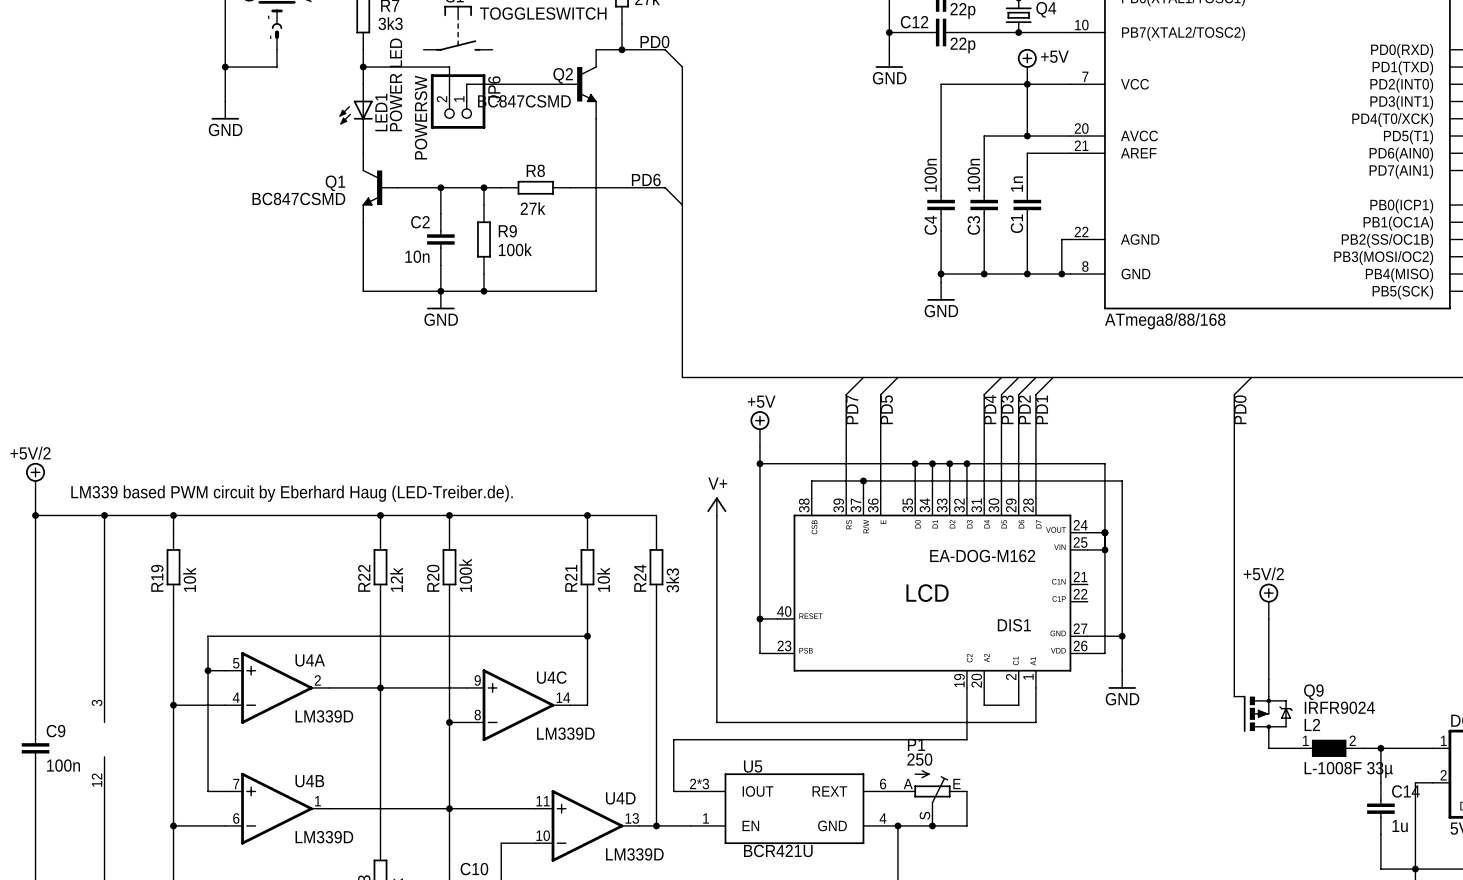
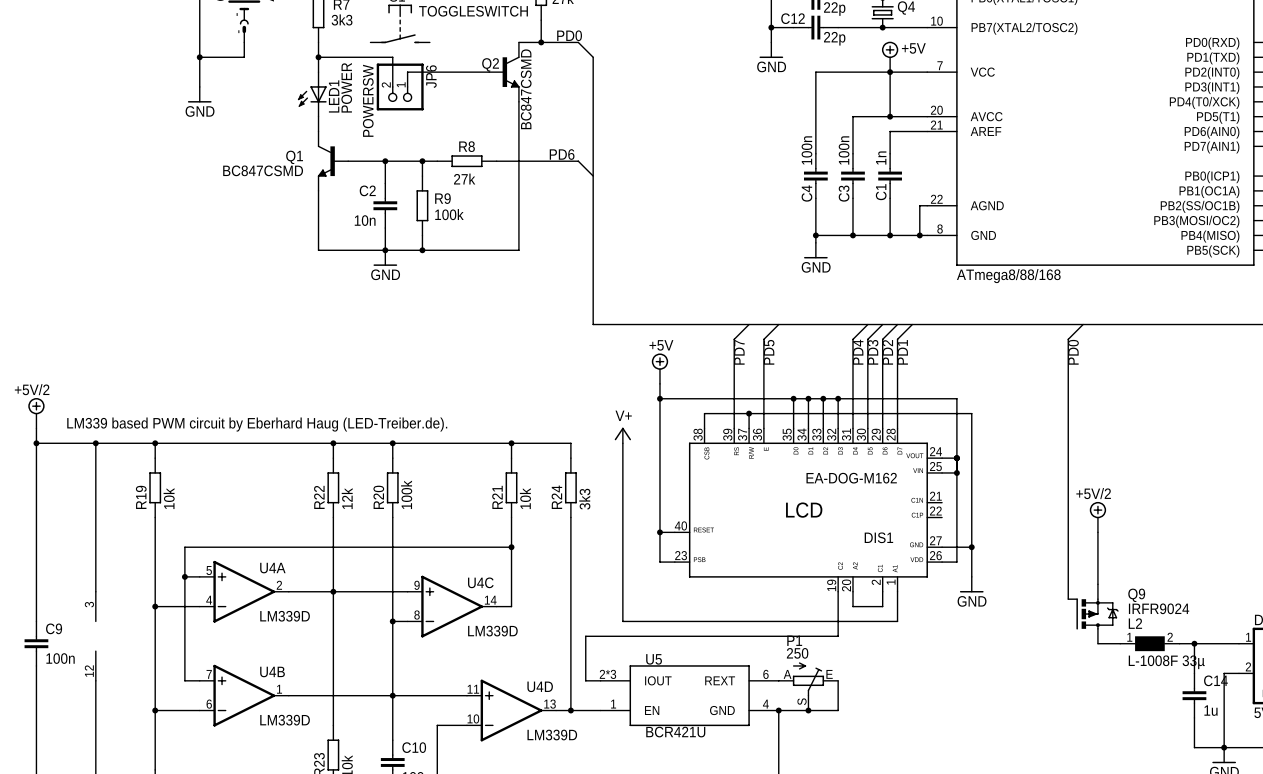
LED1 value: POWER LED (396, 84) -> POWER (346, 87)
Q2 value rotation: 0° (524, 101) -> 90° counterclockwise (526, 89)

